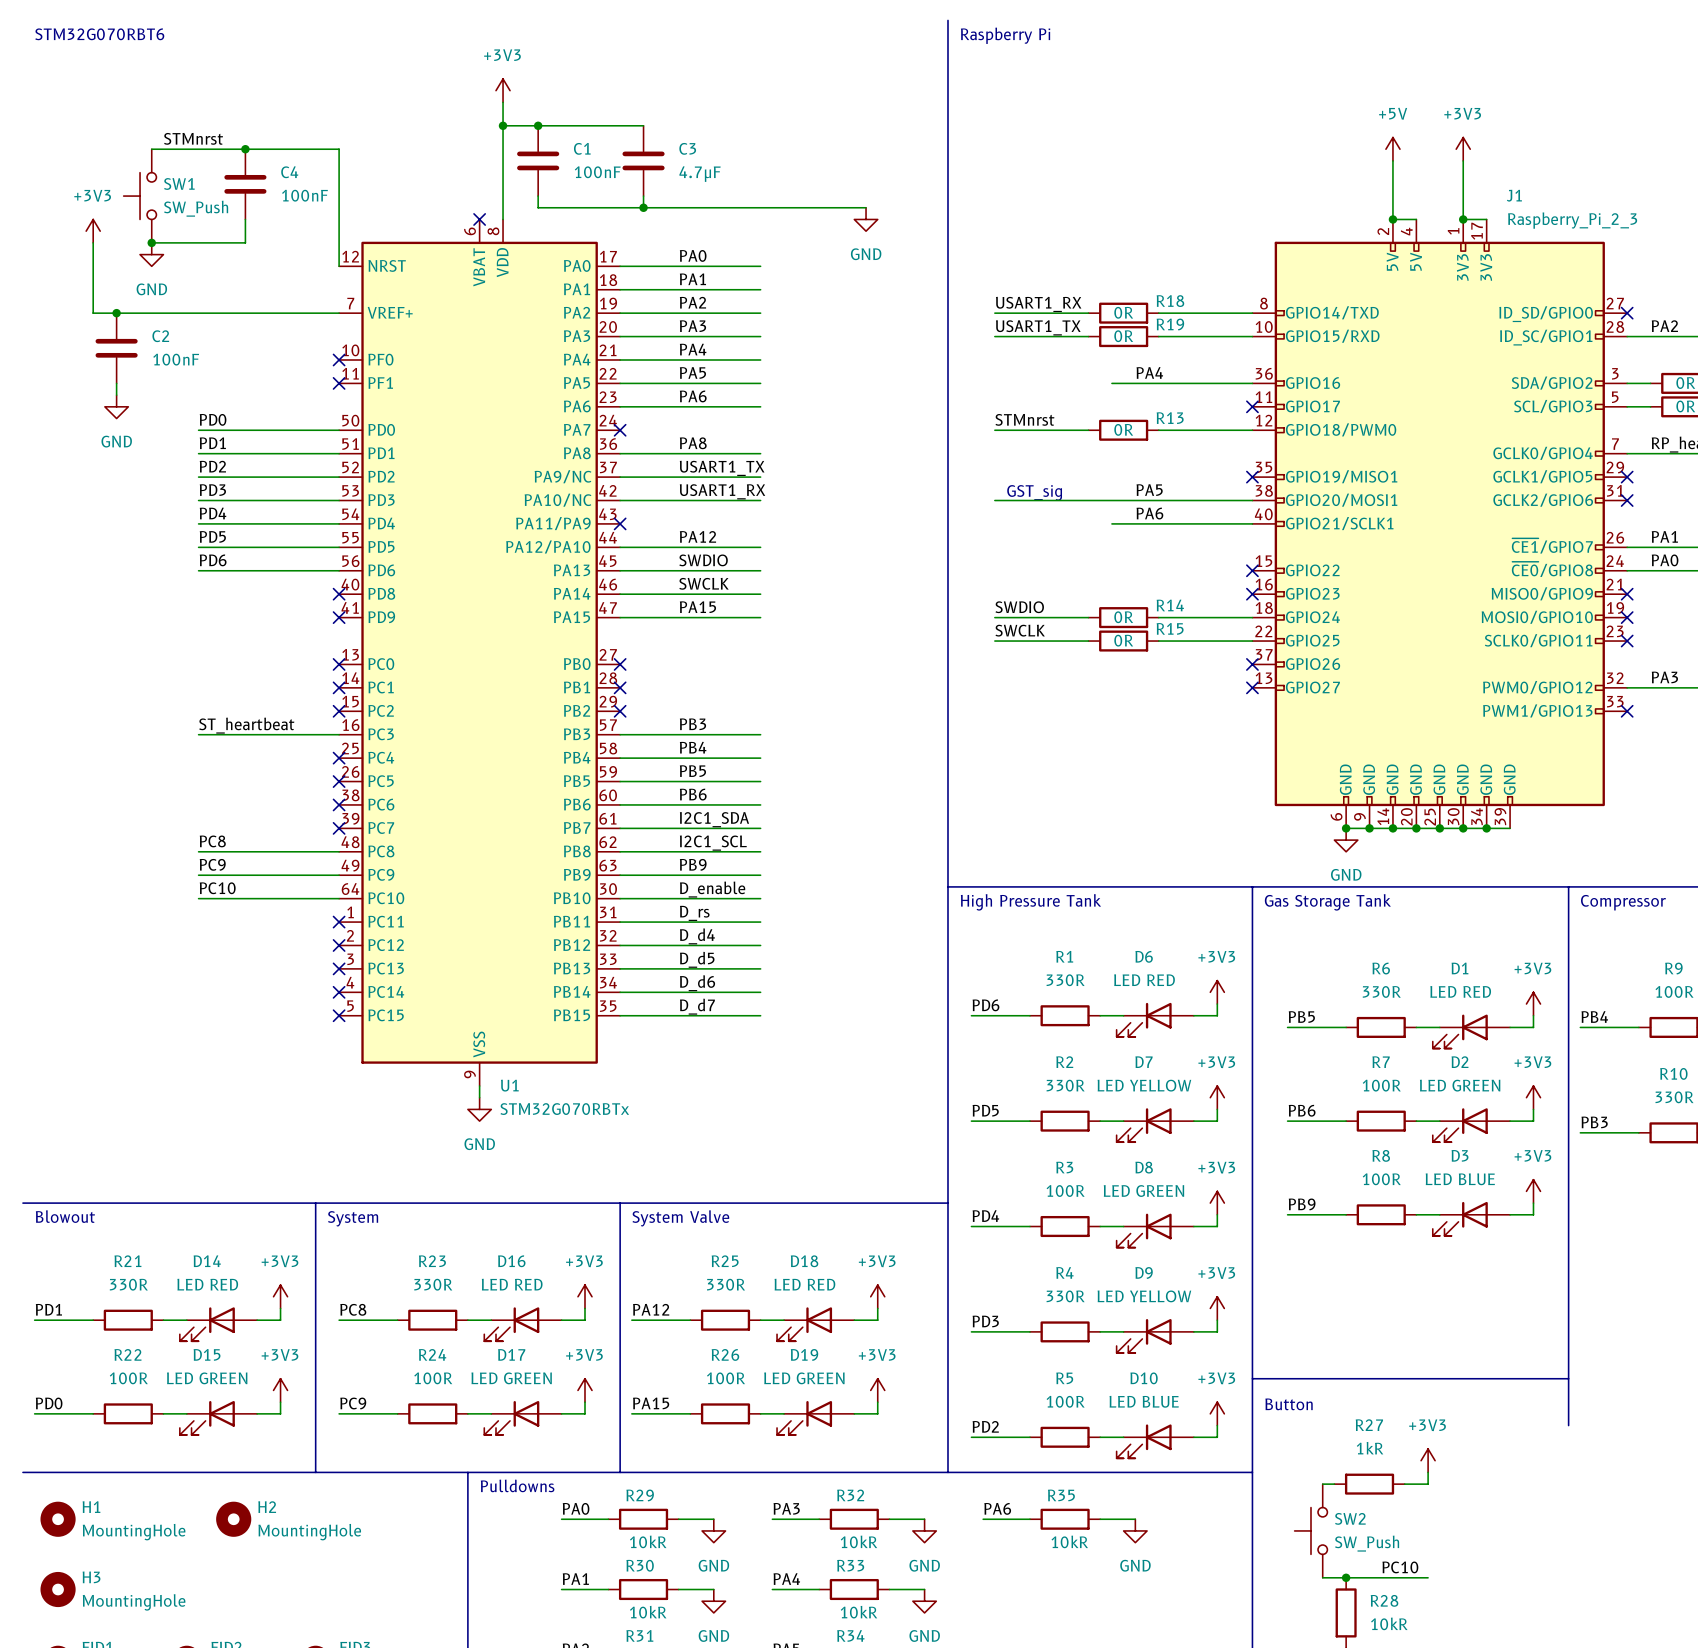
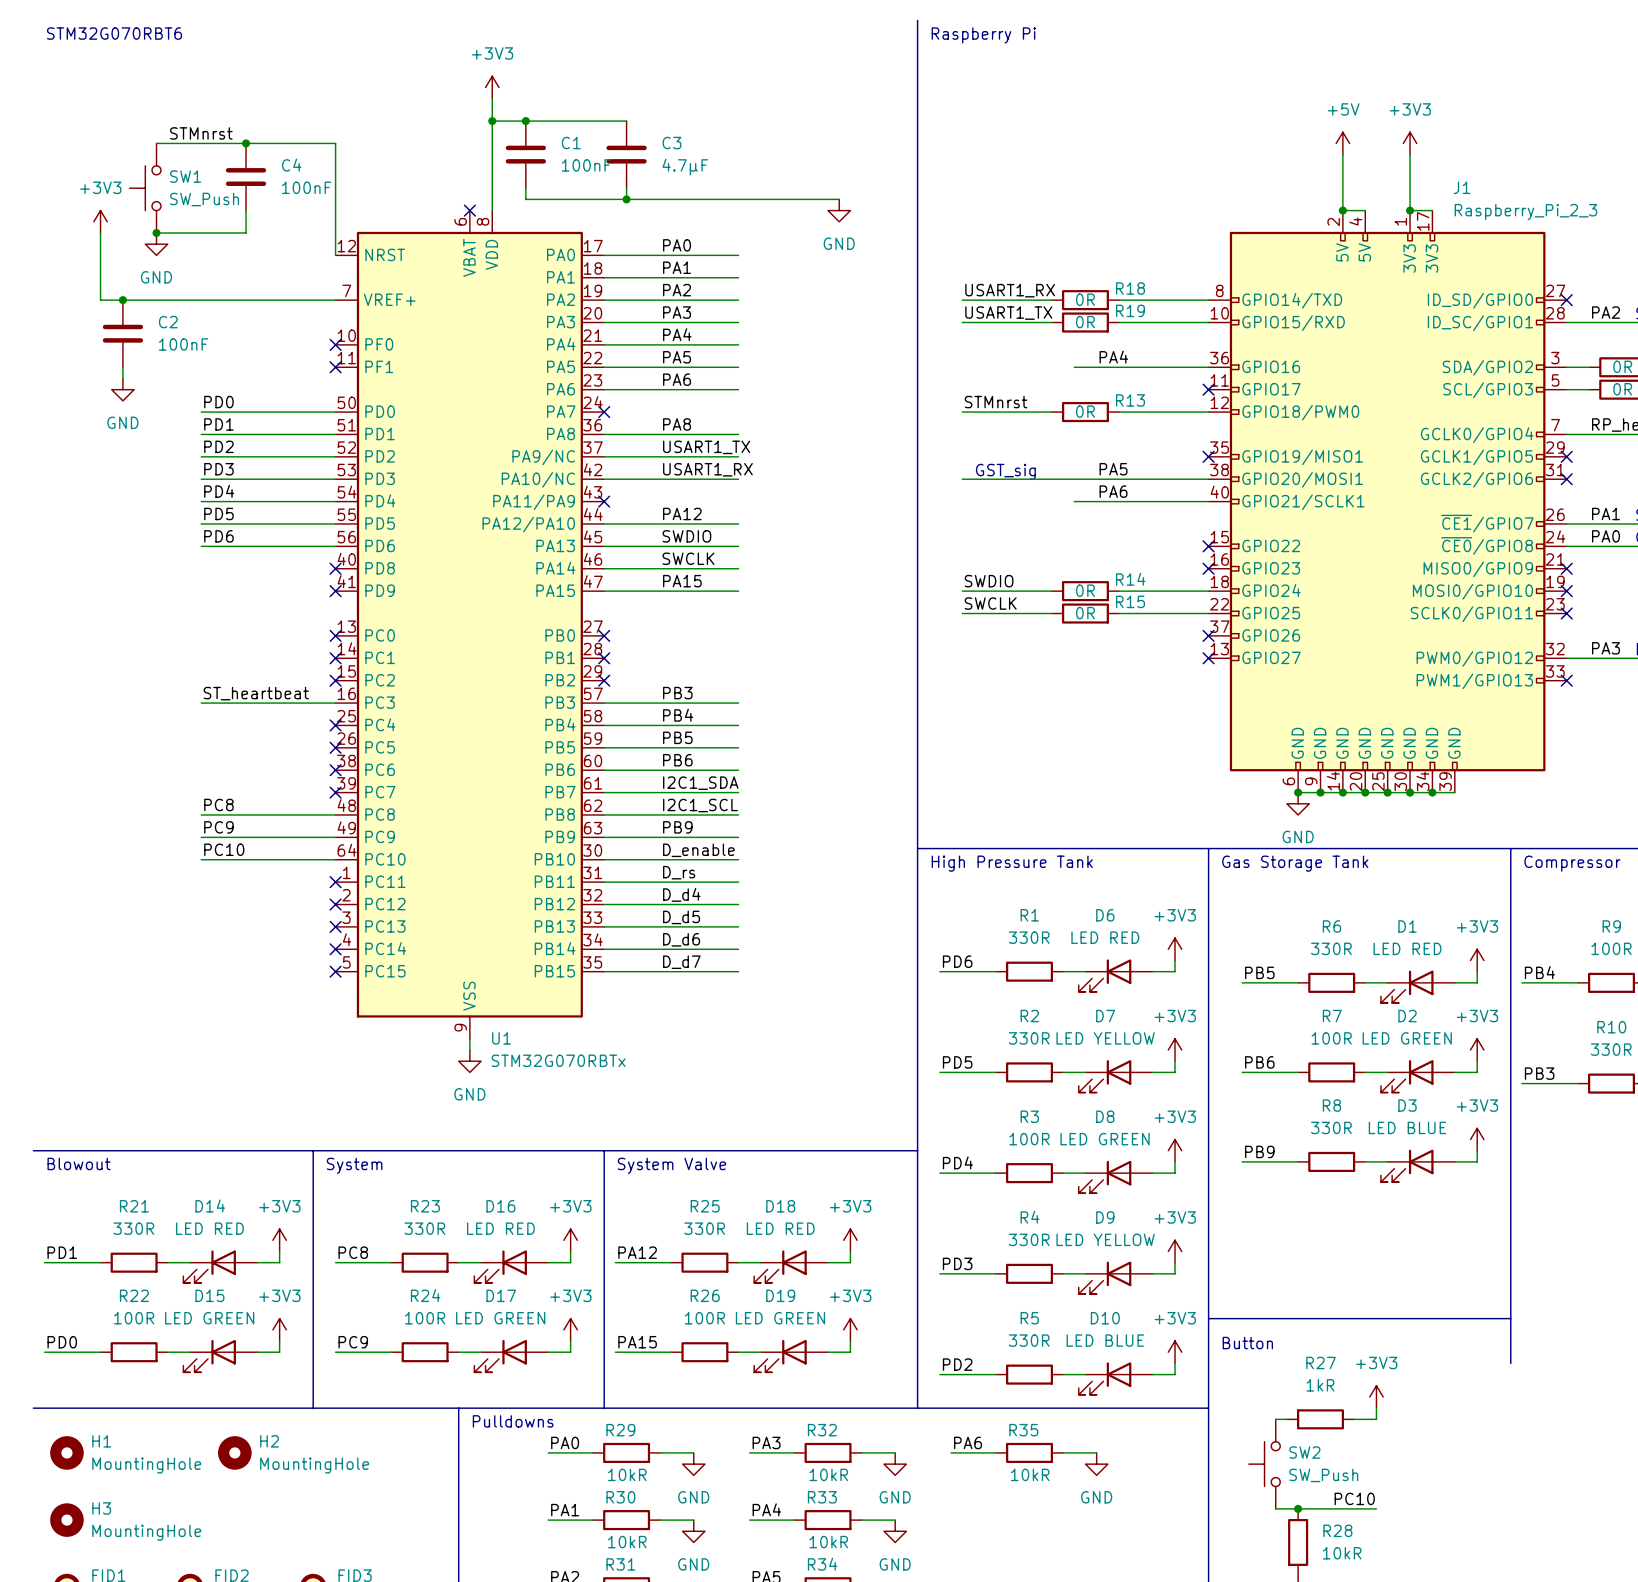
R8 value: 100R (1381, 1179) -> 330R (1331, 1127)
R5 value: 100R (1065, 1401) -> 330R (1029, 1340)

